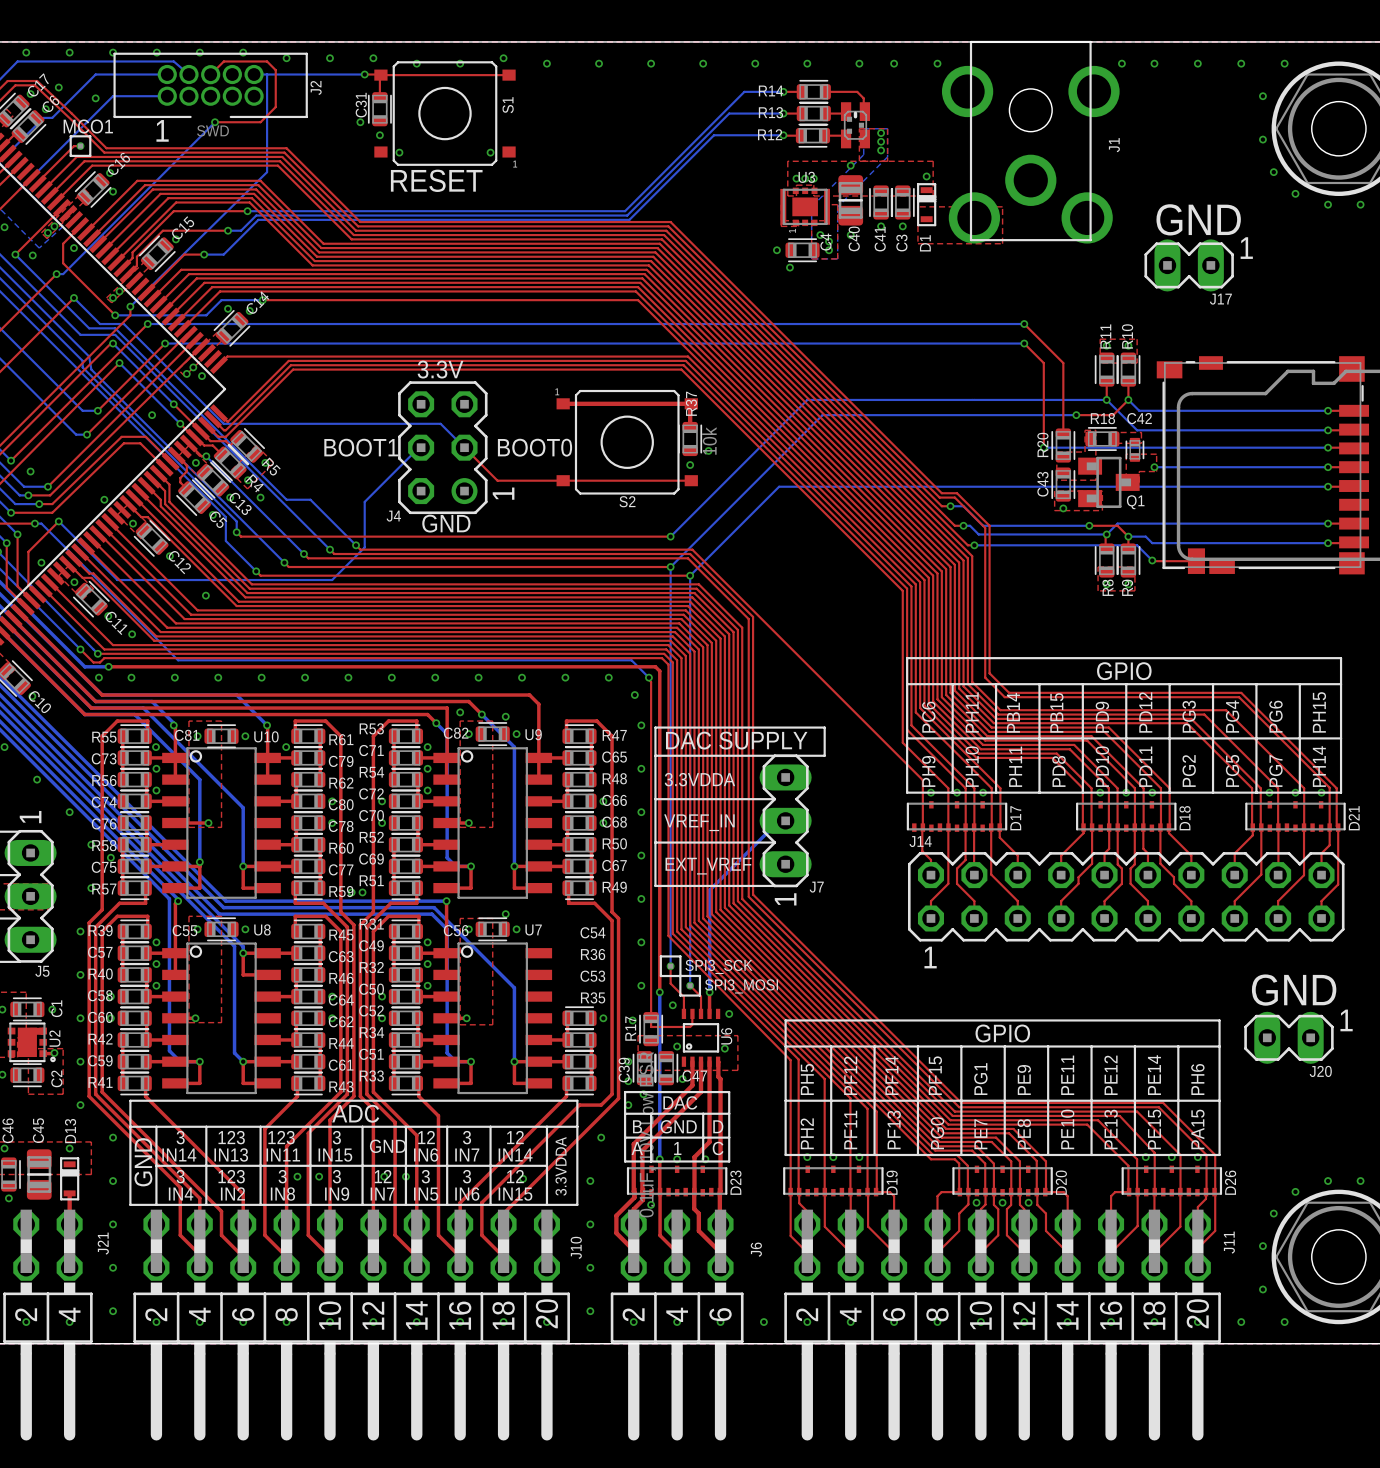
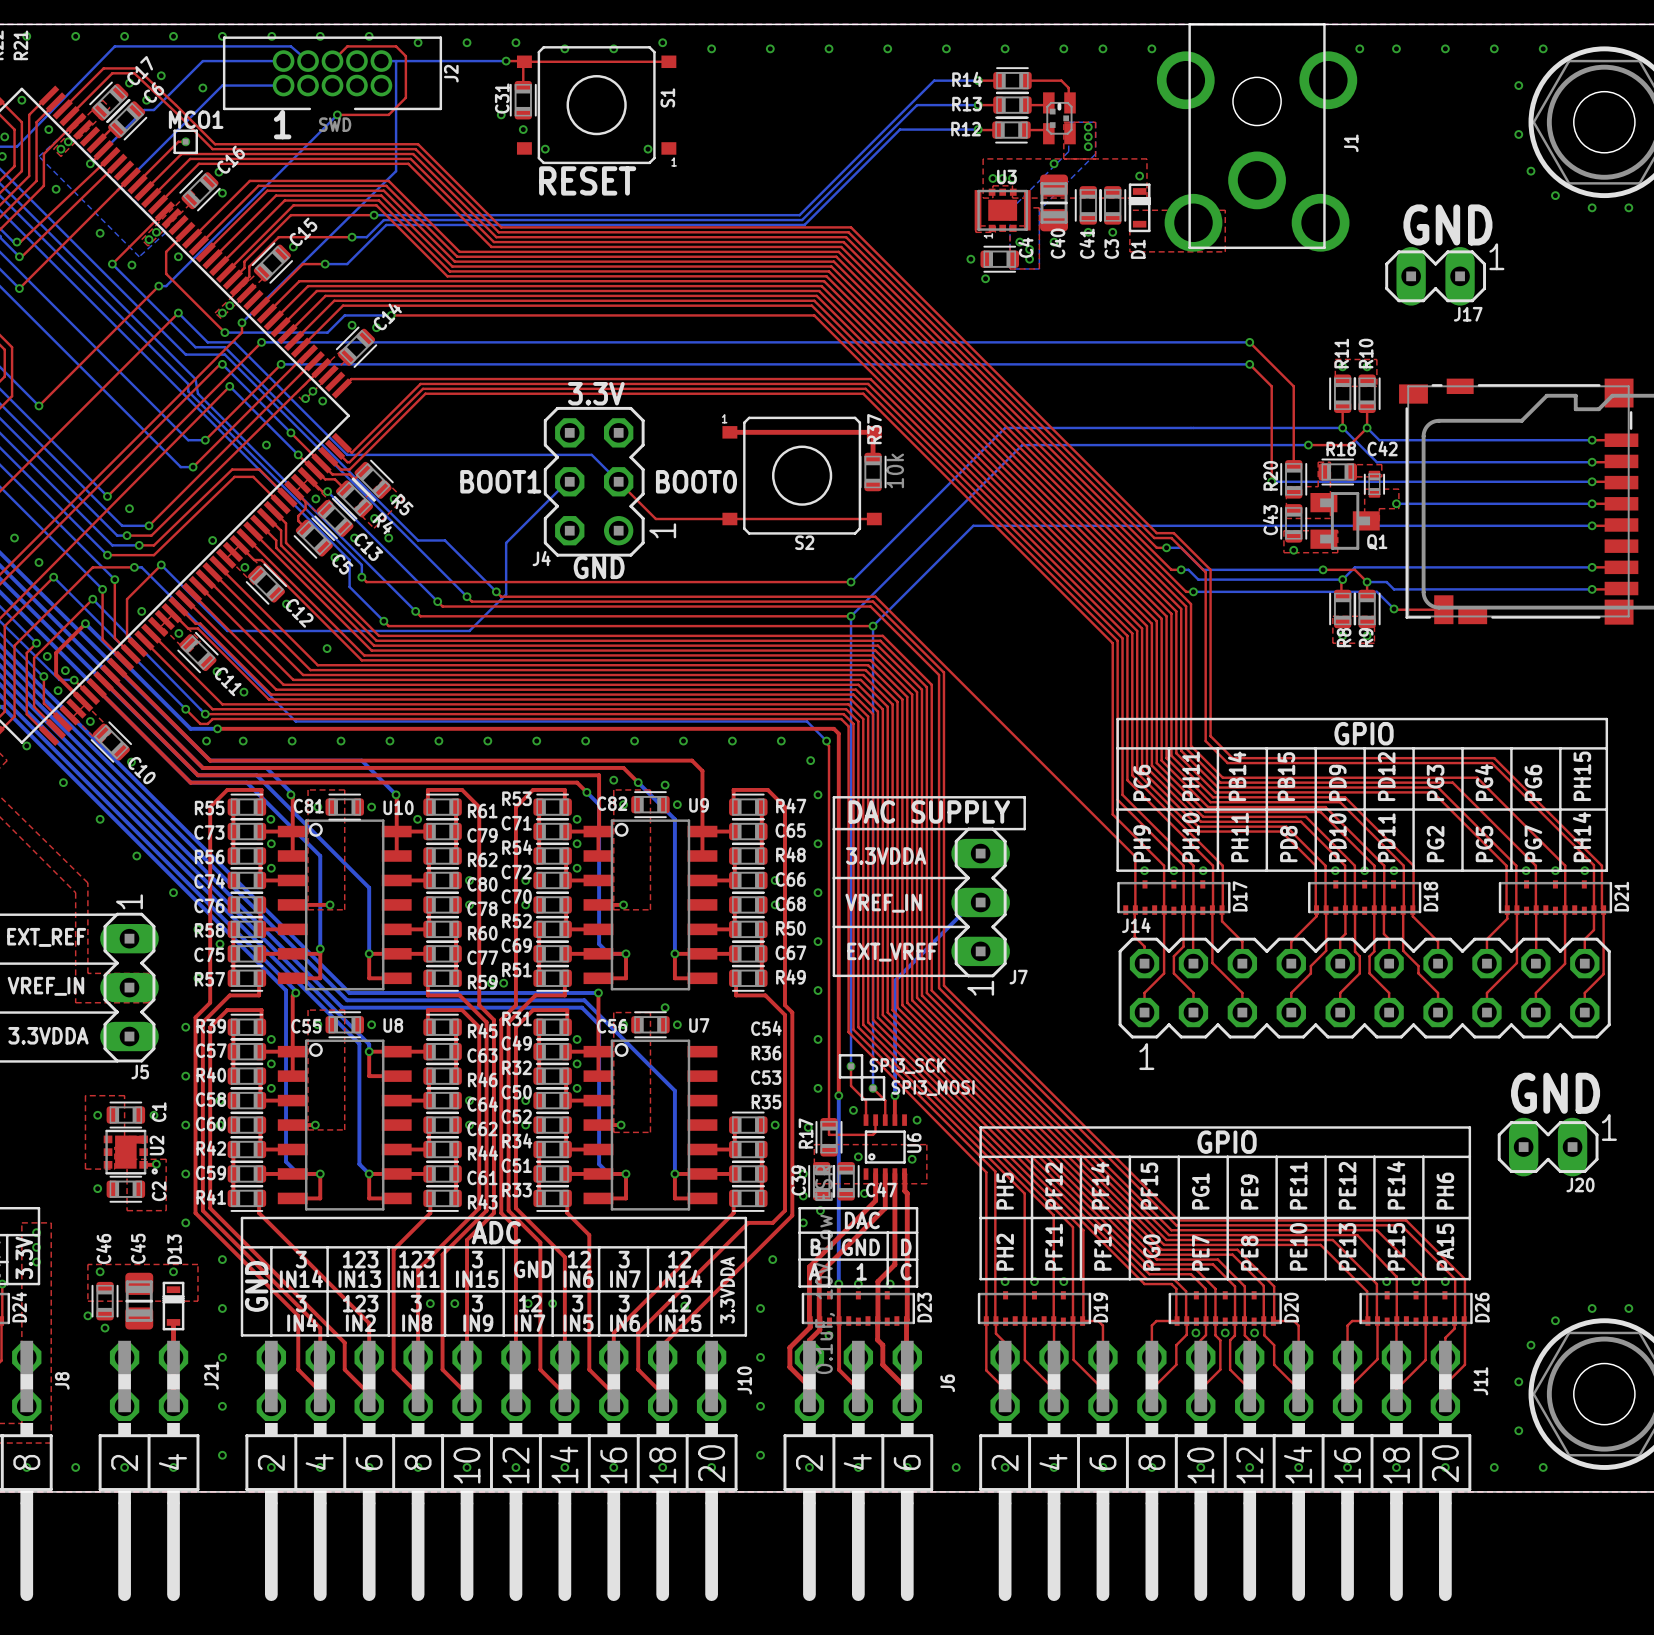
via: (708, 450) -> none
via: (690, 465) -> none

